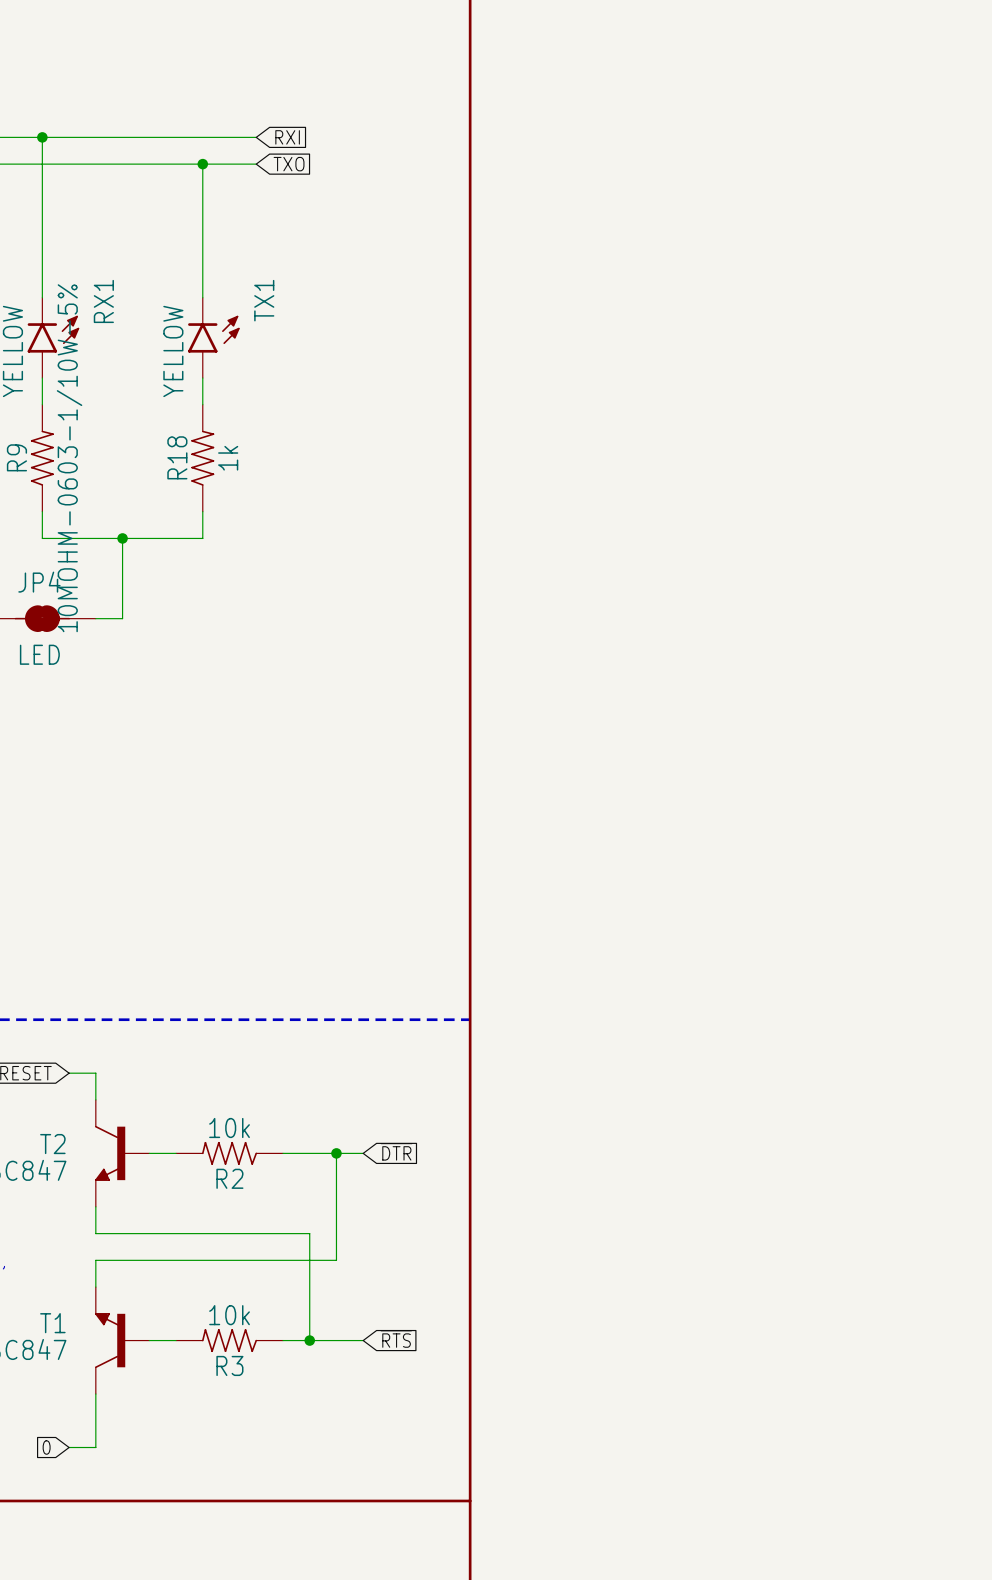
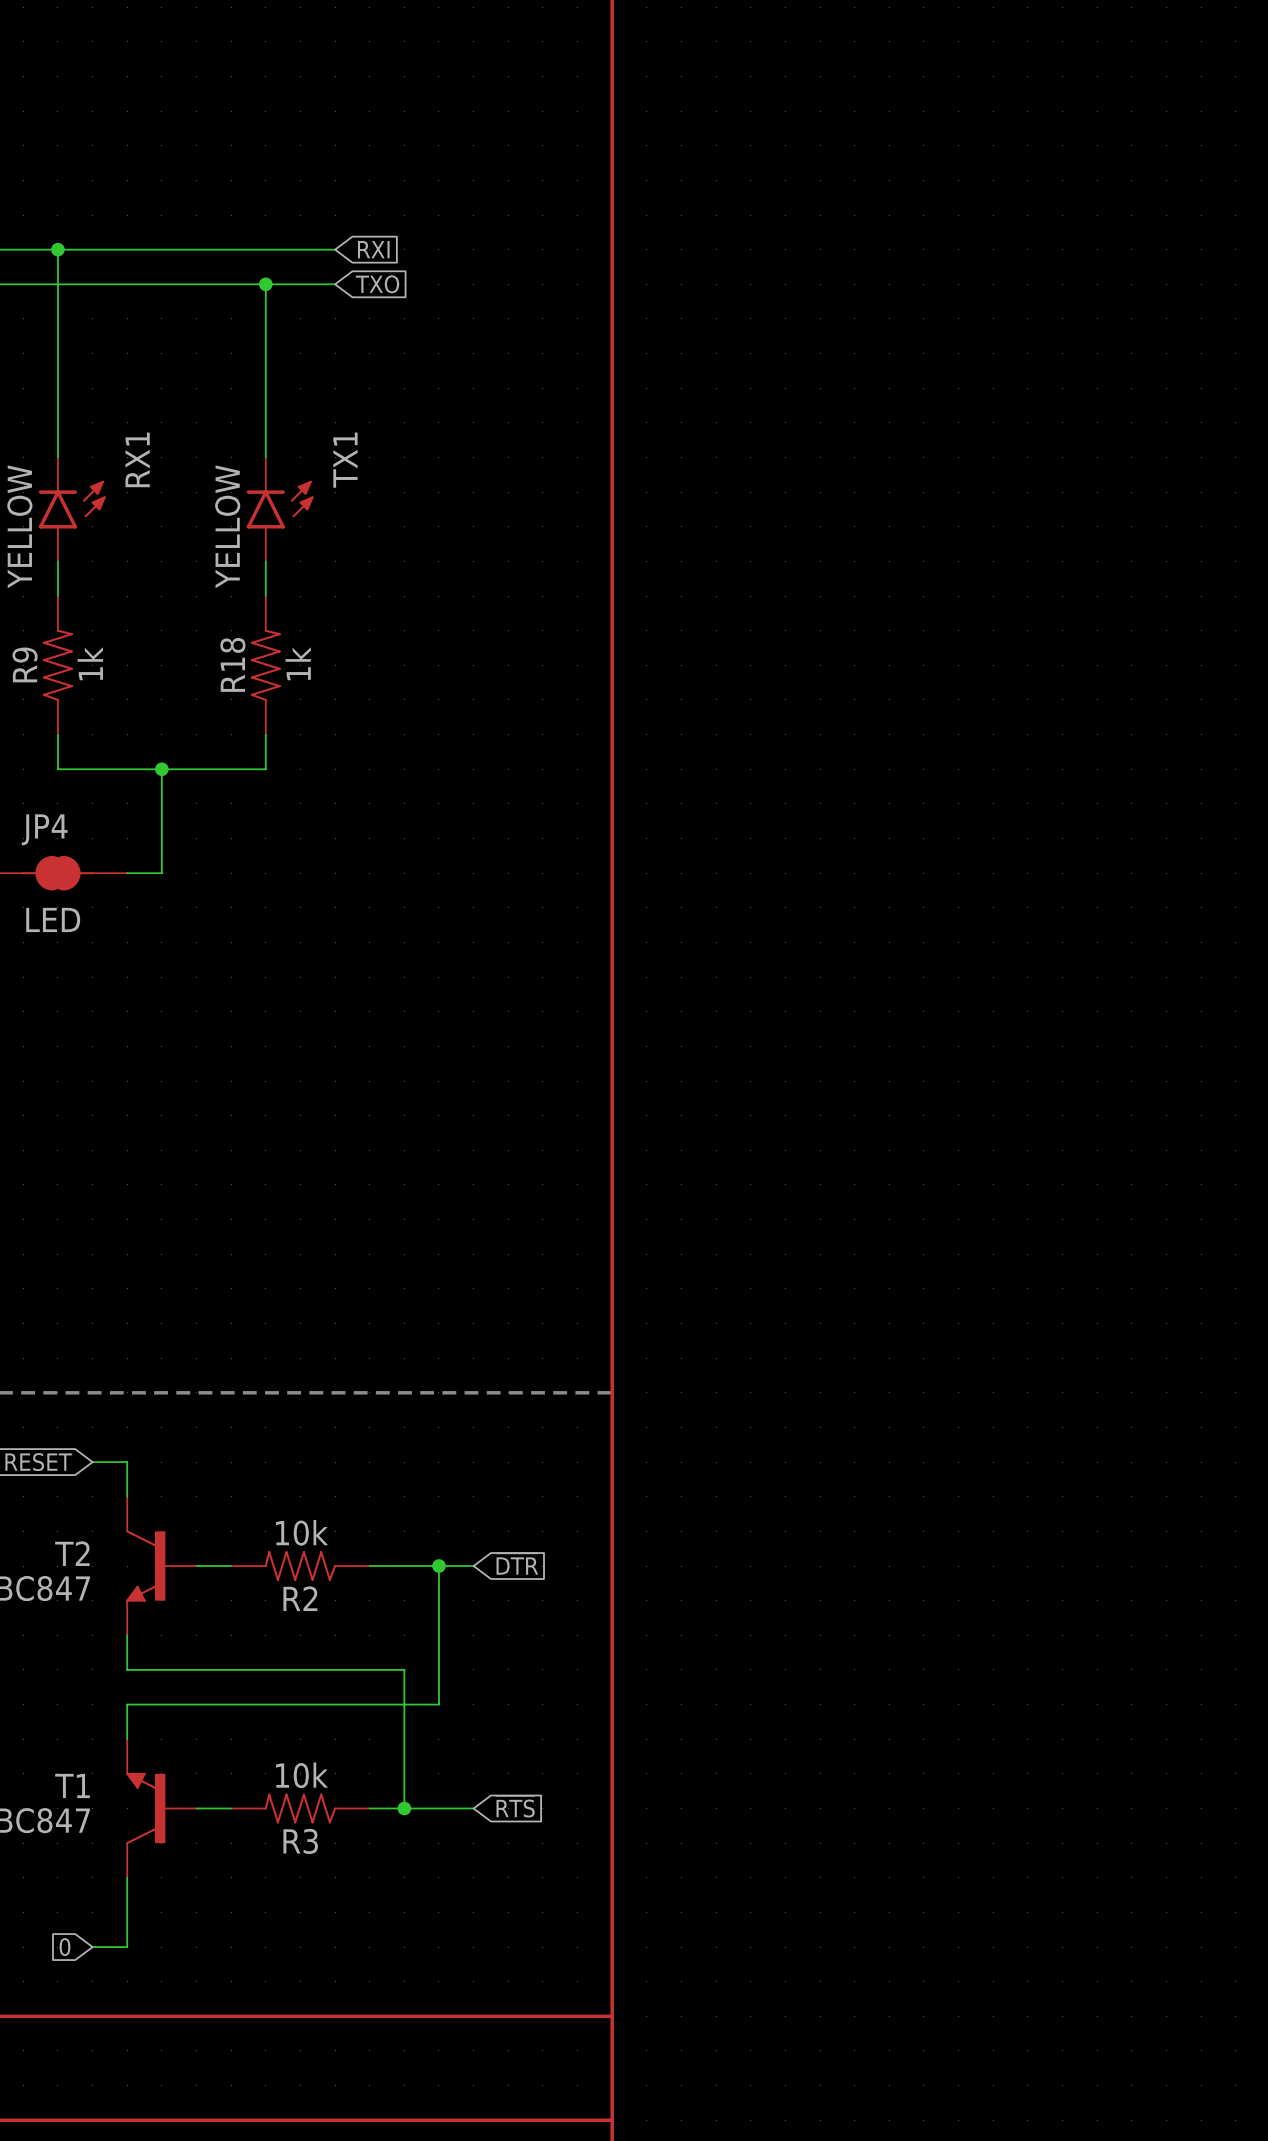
R9 value: 10MOHM-0603-1/10W-5% (69, 458) -> 1k (90, 663)

